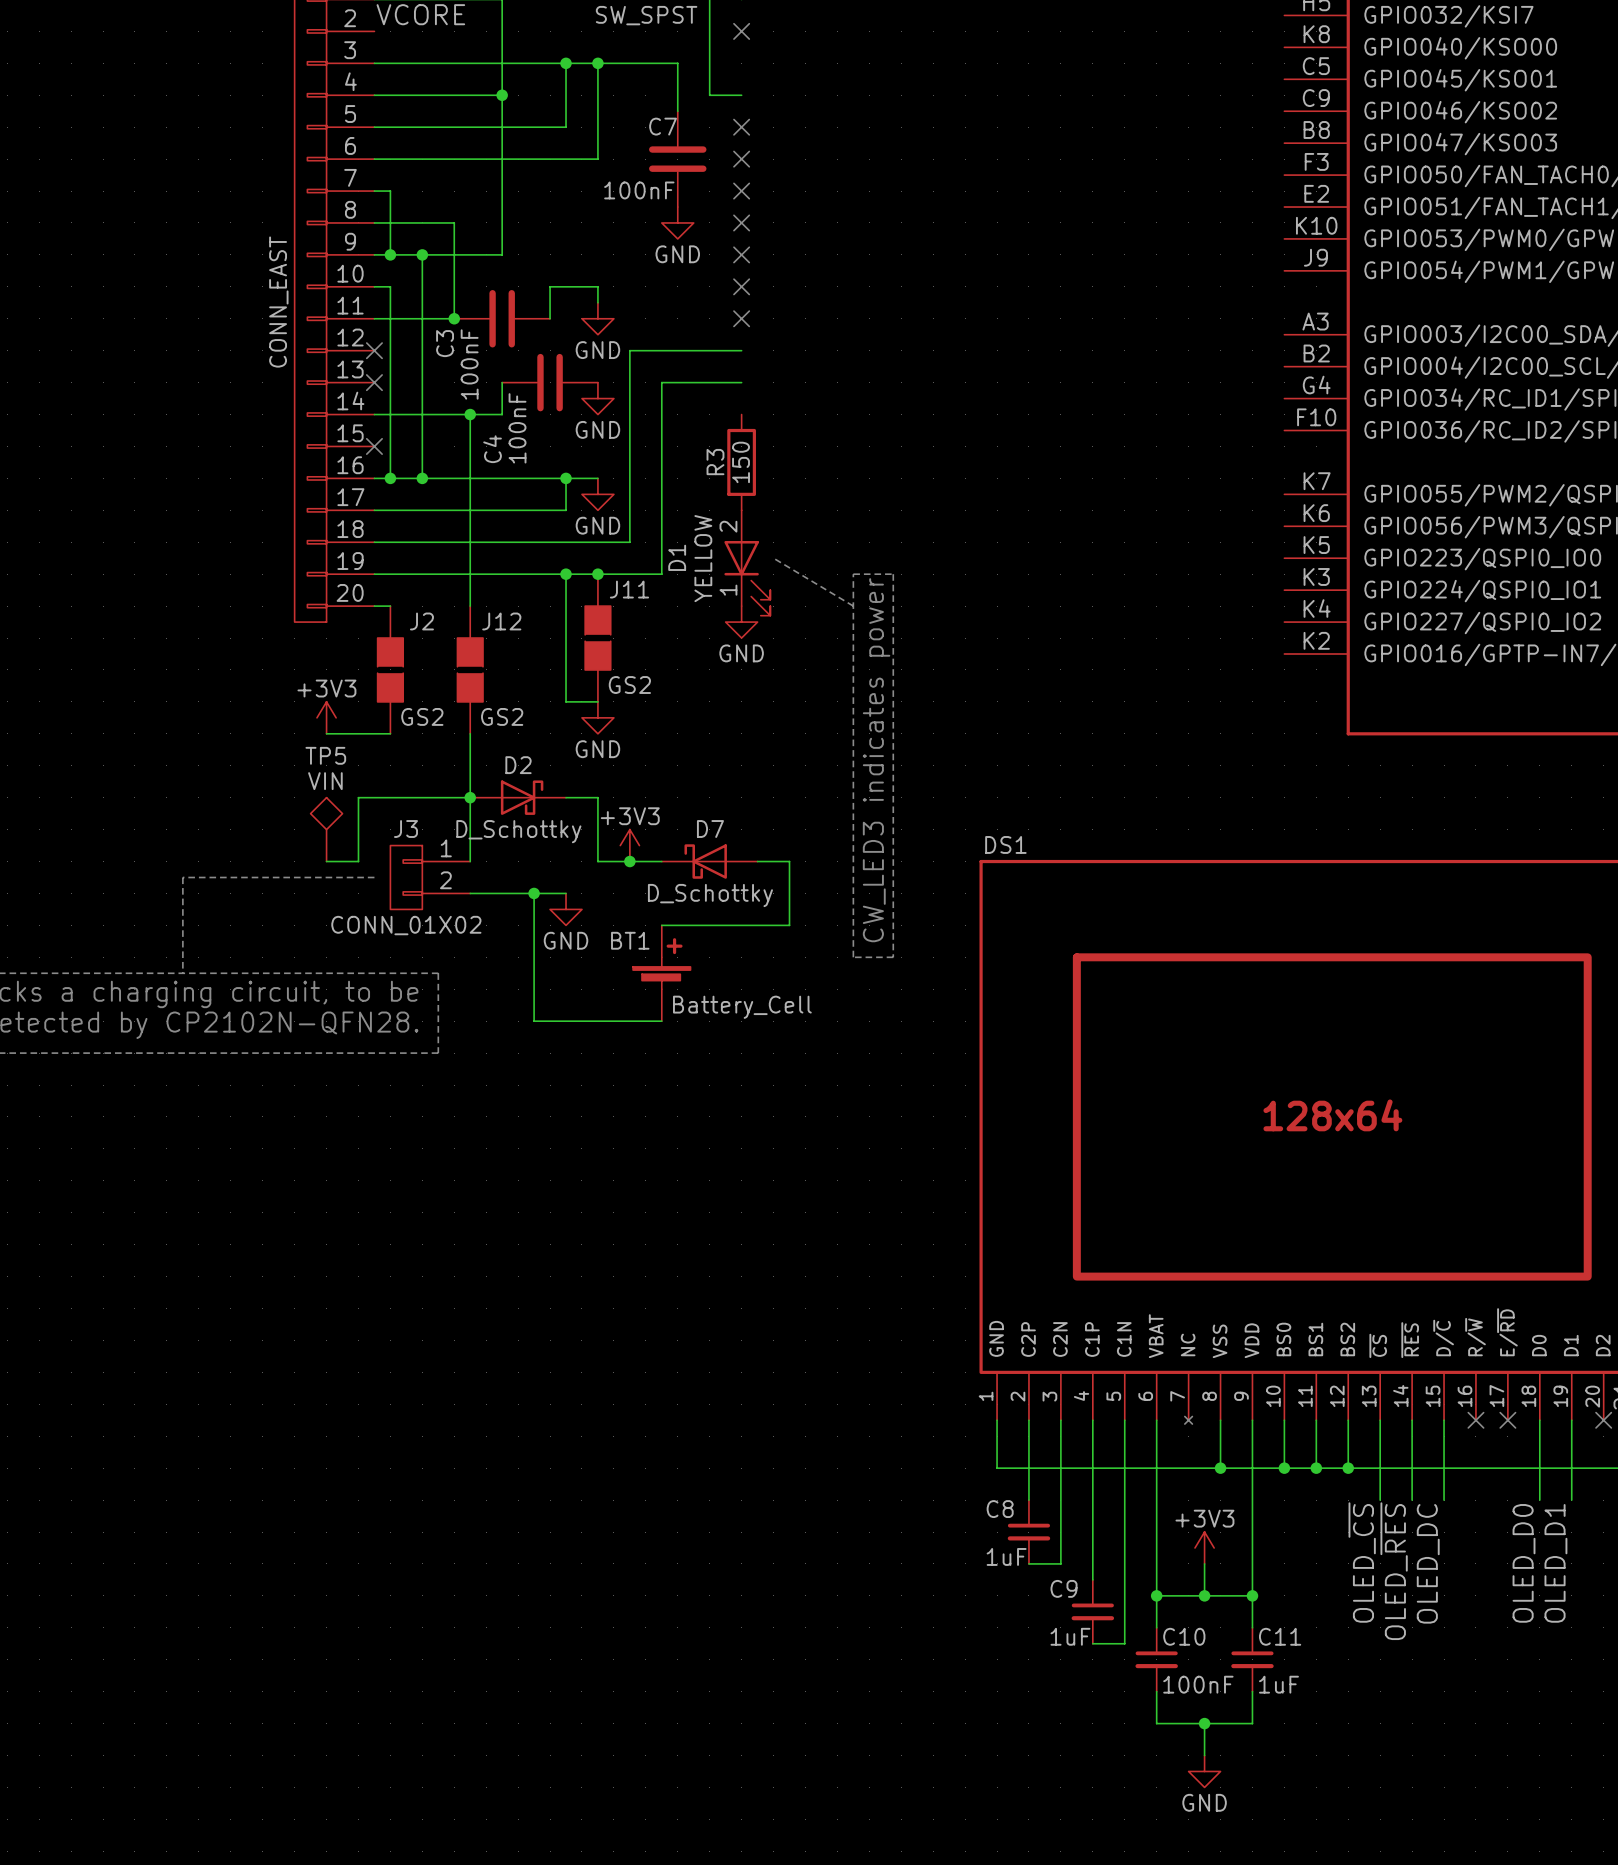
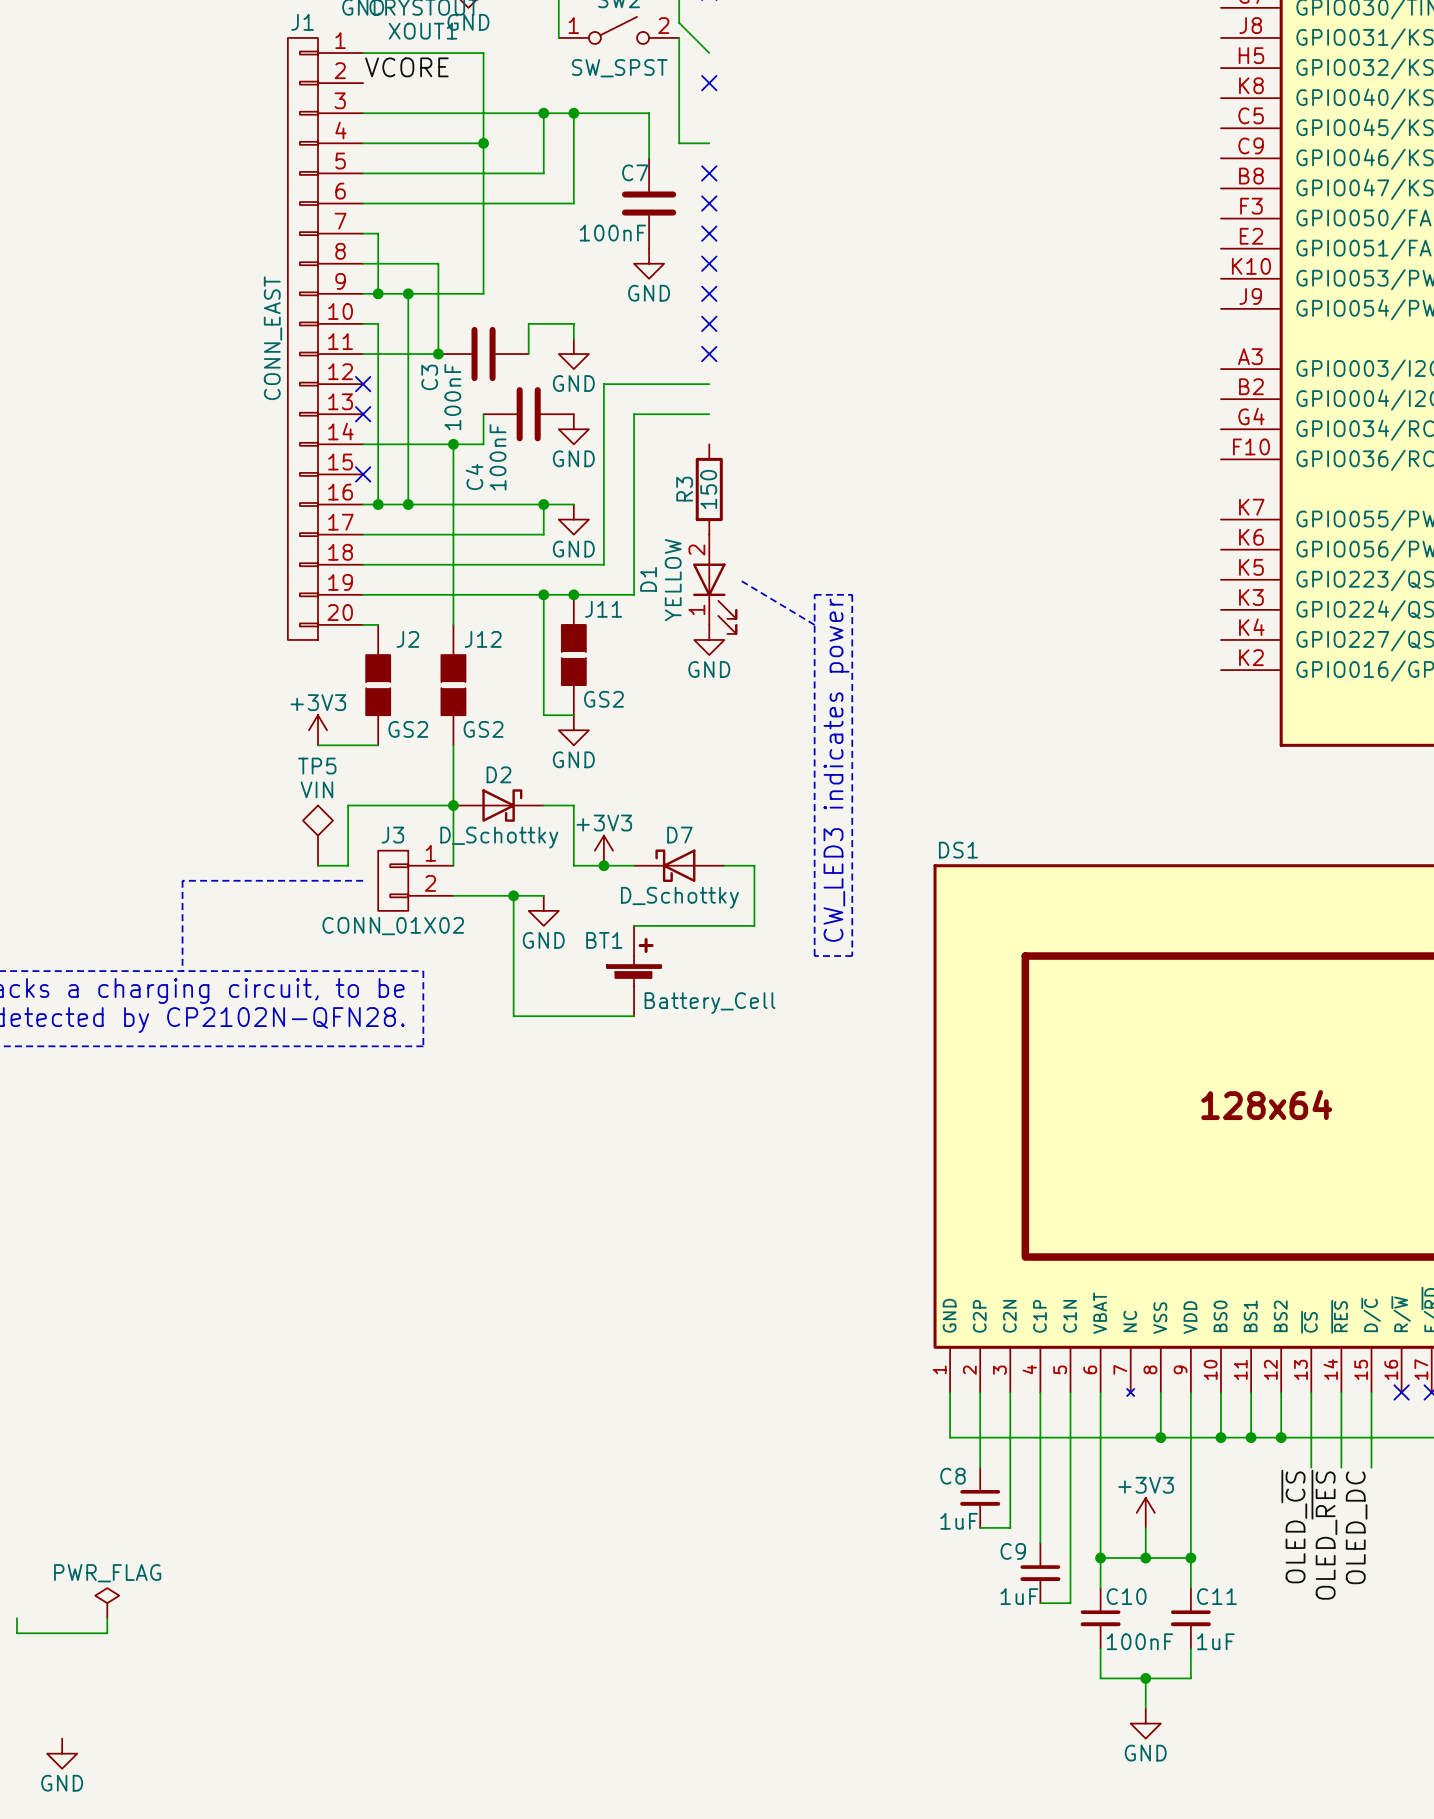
power symbol: none -> PWR_FLAG (107, 1603)
wire: none -> (16, 1618) (16, 1633) (107, 1633) (107, 1618)
power symbol: none -> GND (62, 1753)

